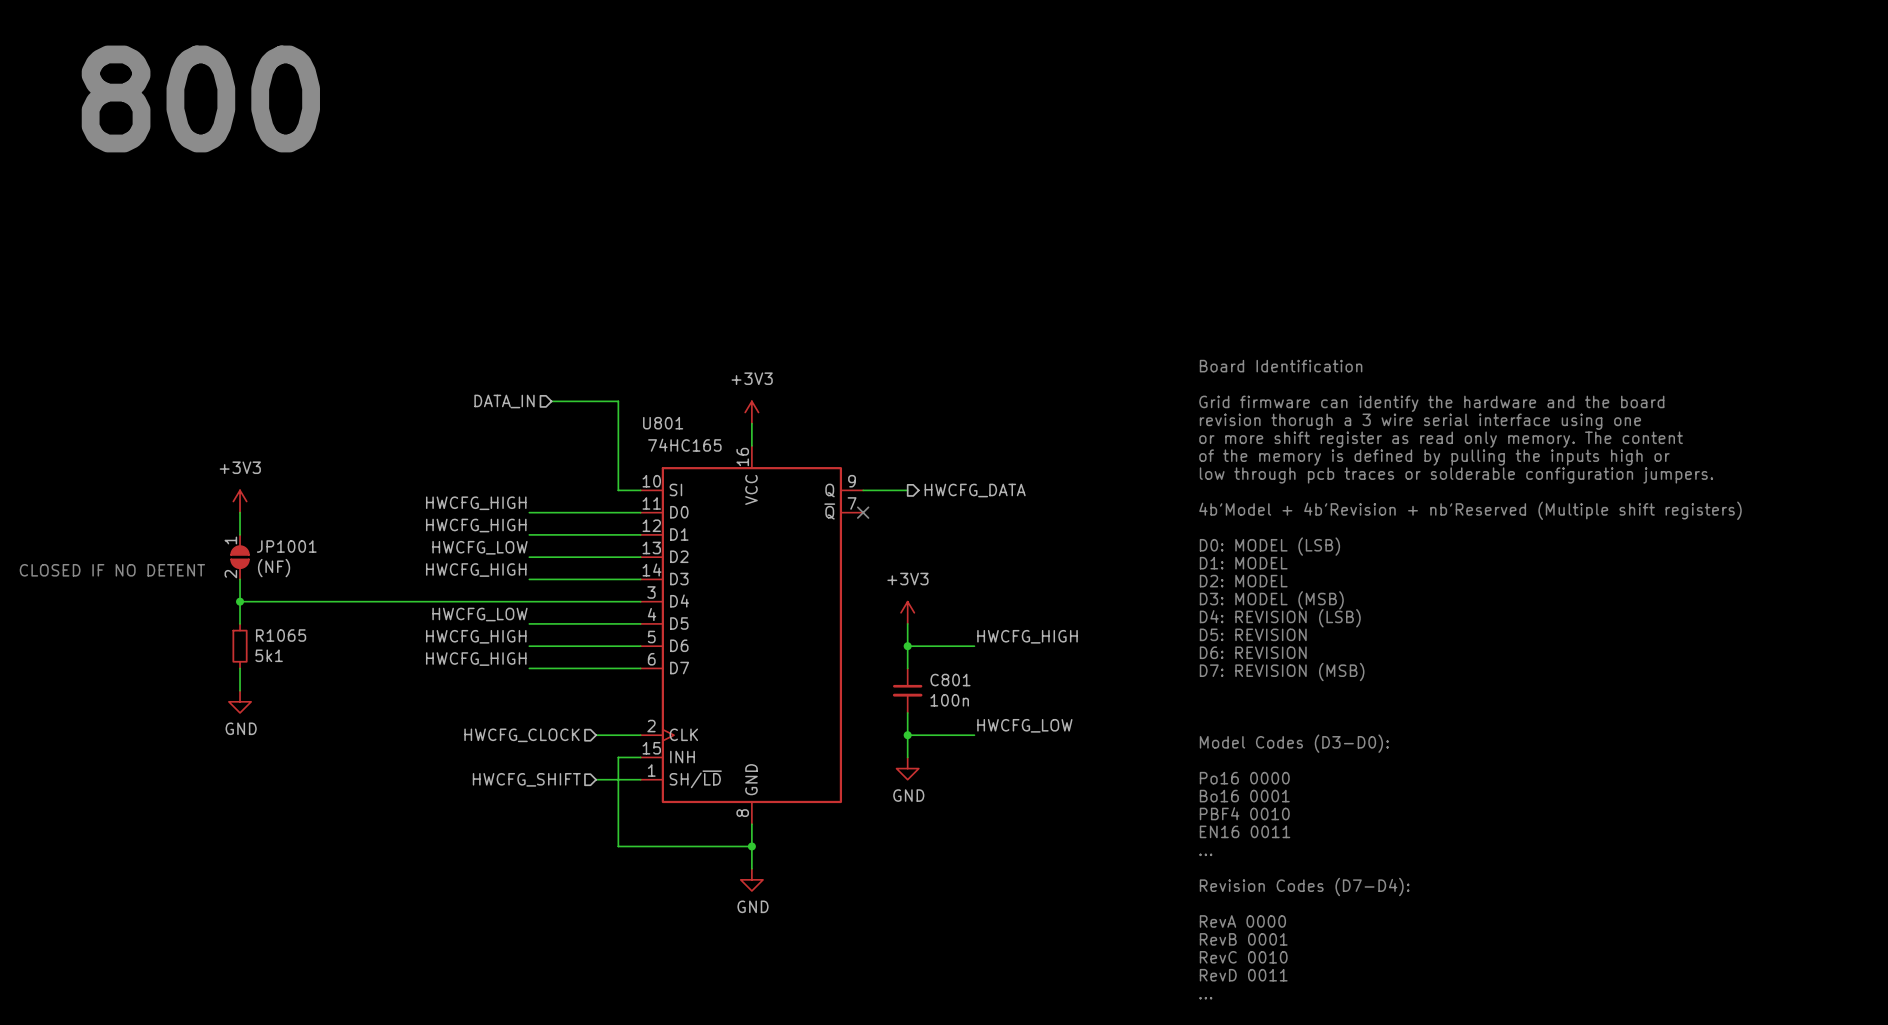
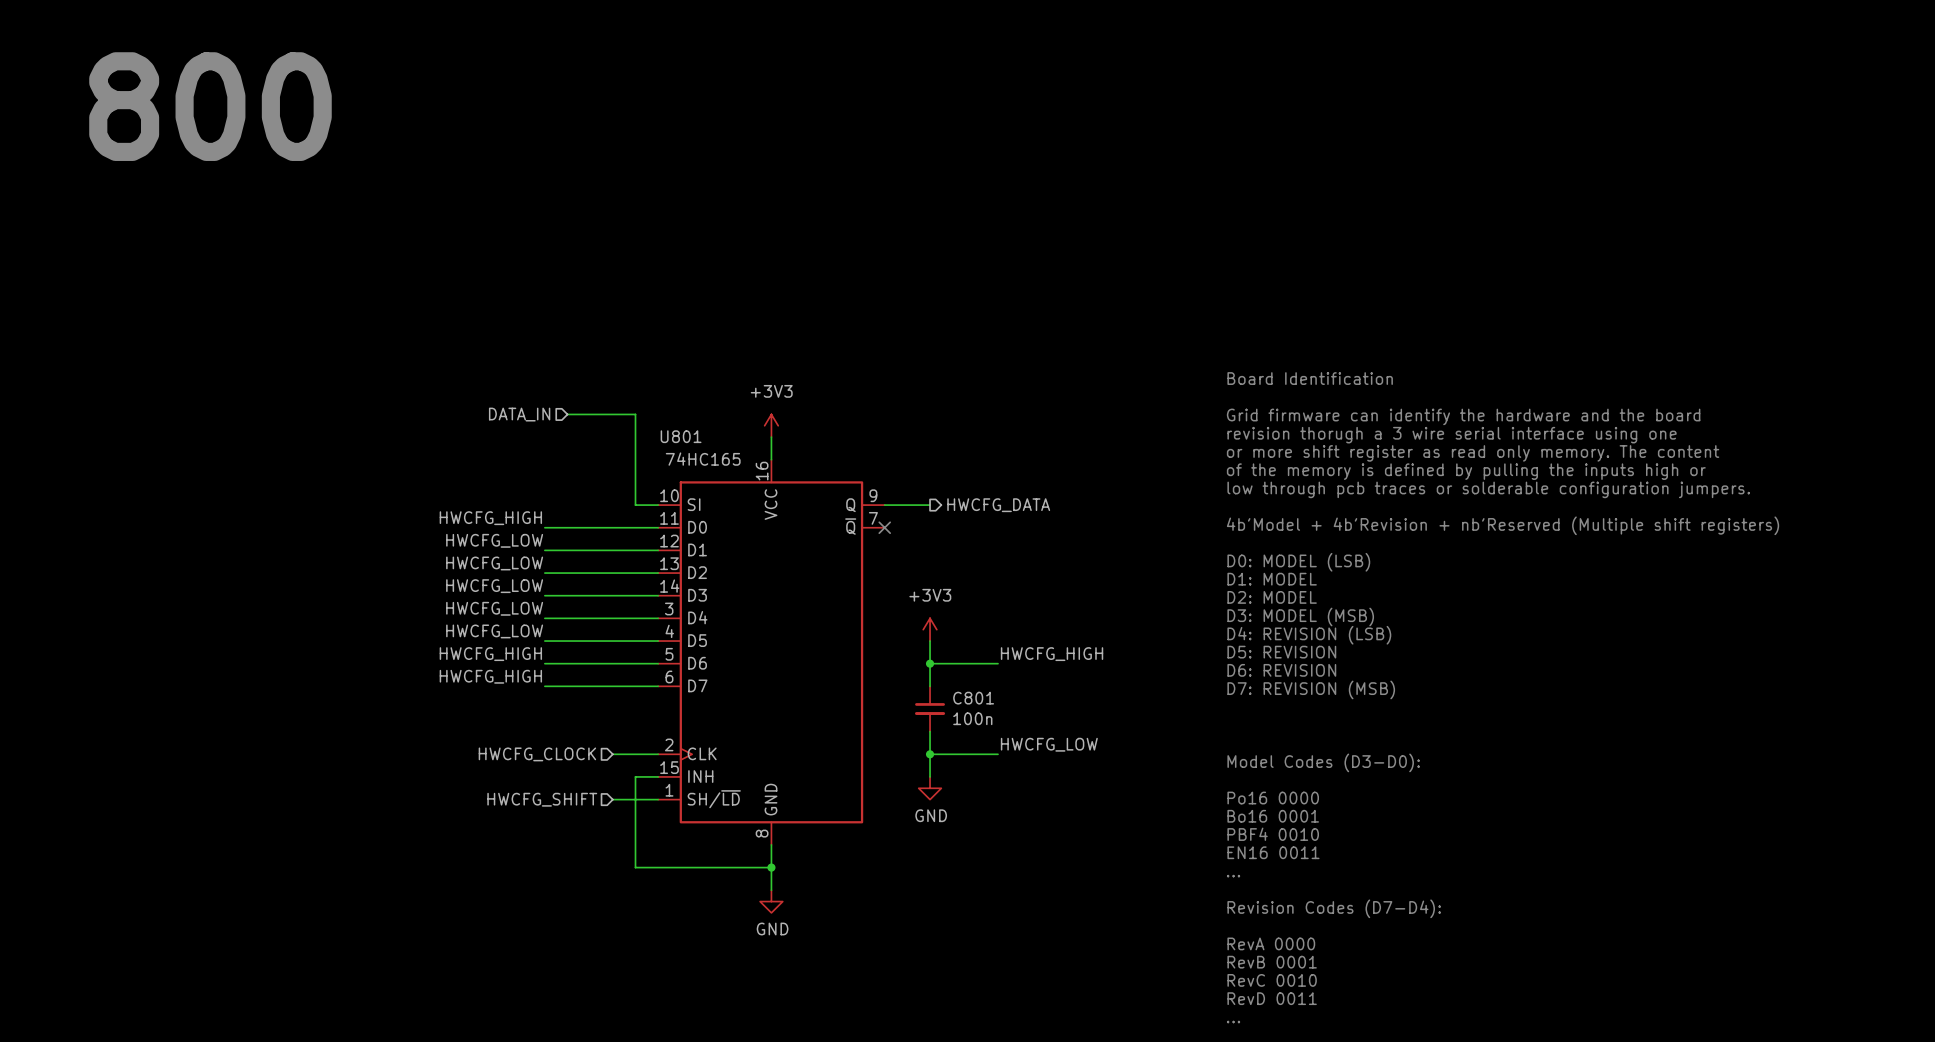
power symbol: +3V3 (240, 501) -> none
wire: (240, 512) (240, 534) -> none
label: HWCFG_HIGH (476, 525) -> HWCFG_LOW (494, 540)
JP1001: (NF) (240, 557) -> none
text: CLOSED IF NO DETENT (112, 570) -> none
label: HWCFG_HIGH (476, 570) -> HWCFG_LOW (494, 586)
wire: (240, 579) (240, 623) -> none
label: none -> HWCFG_LOW (494, 608)
wire: (240, 601) (529, 601) -> none
junction: (240, 601) -> none
R1065: 5k1 (240, 646) -> none
wire: (240, 668) (240, 690) -> none
power symbol: GND (240, 701) -> none

